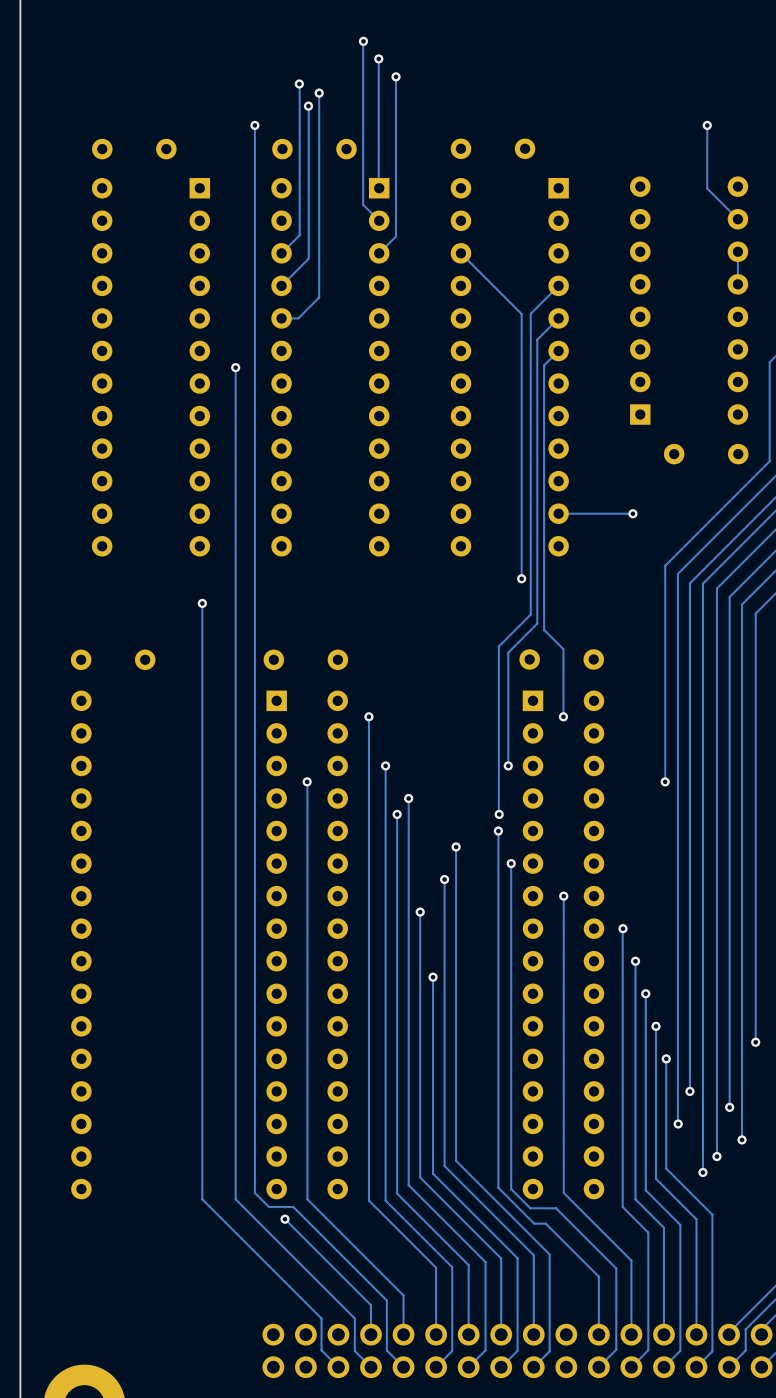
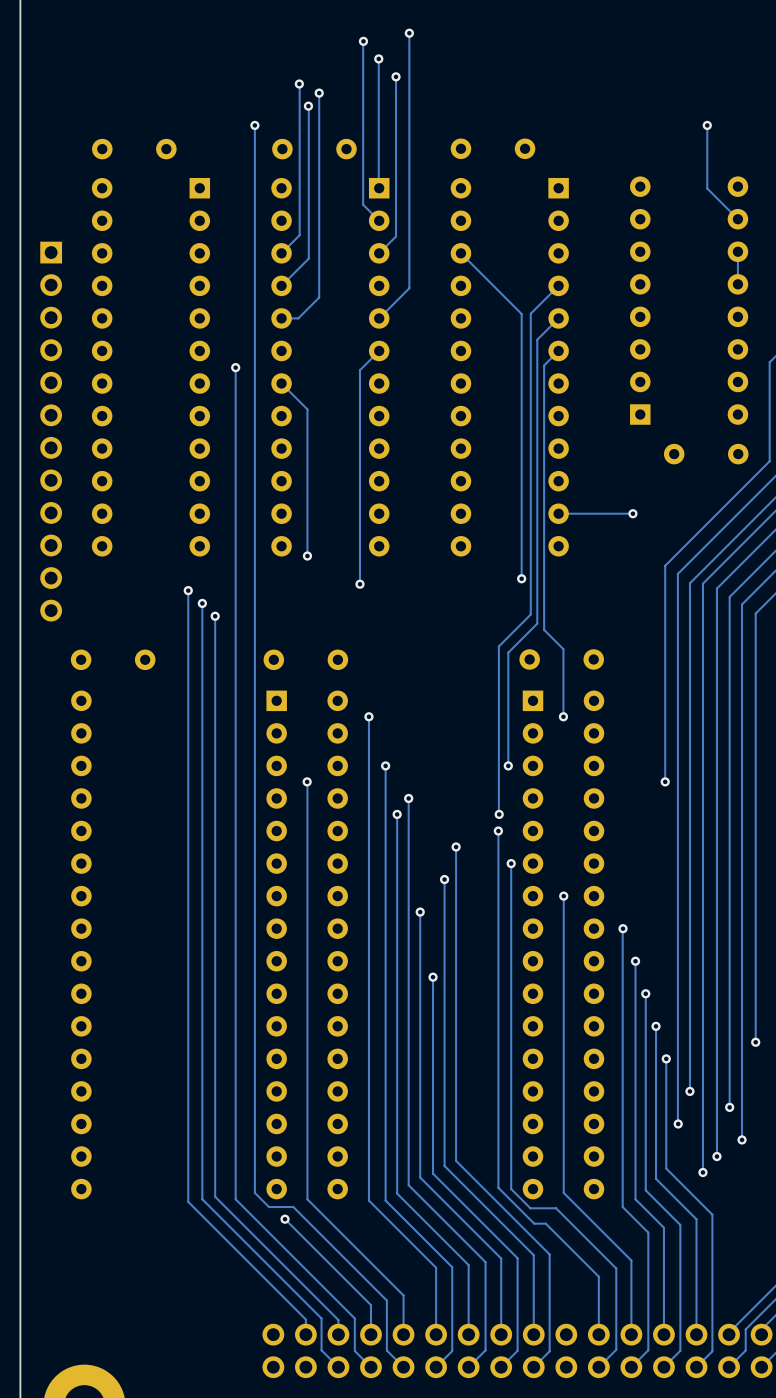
track: none -> (409, 33) (409, 288) (379, 318)
via: none -> (409, 33)
track: none -> (379, 350) (359, 370) (359, 584)
track: none -> (281, 383) (307, 409) (307, 556)
part: none -> (51, 431)
via: none -> (307, 556)
via: none -> (359, 584)
track: none -> (188, 590) (188, 1201) (305, 1319) (305, 1334)
via: none -> (188, 590)
track: none -> (215, 616) (215, 1196) (338, 1320) (338, 1334)
via: none -> (215, 616)

